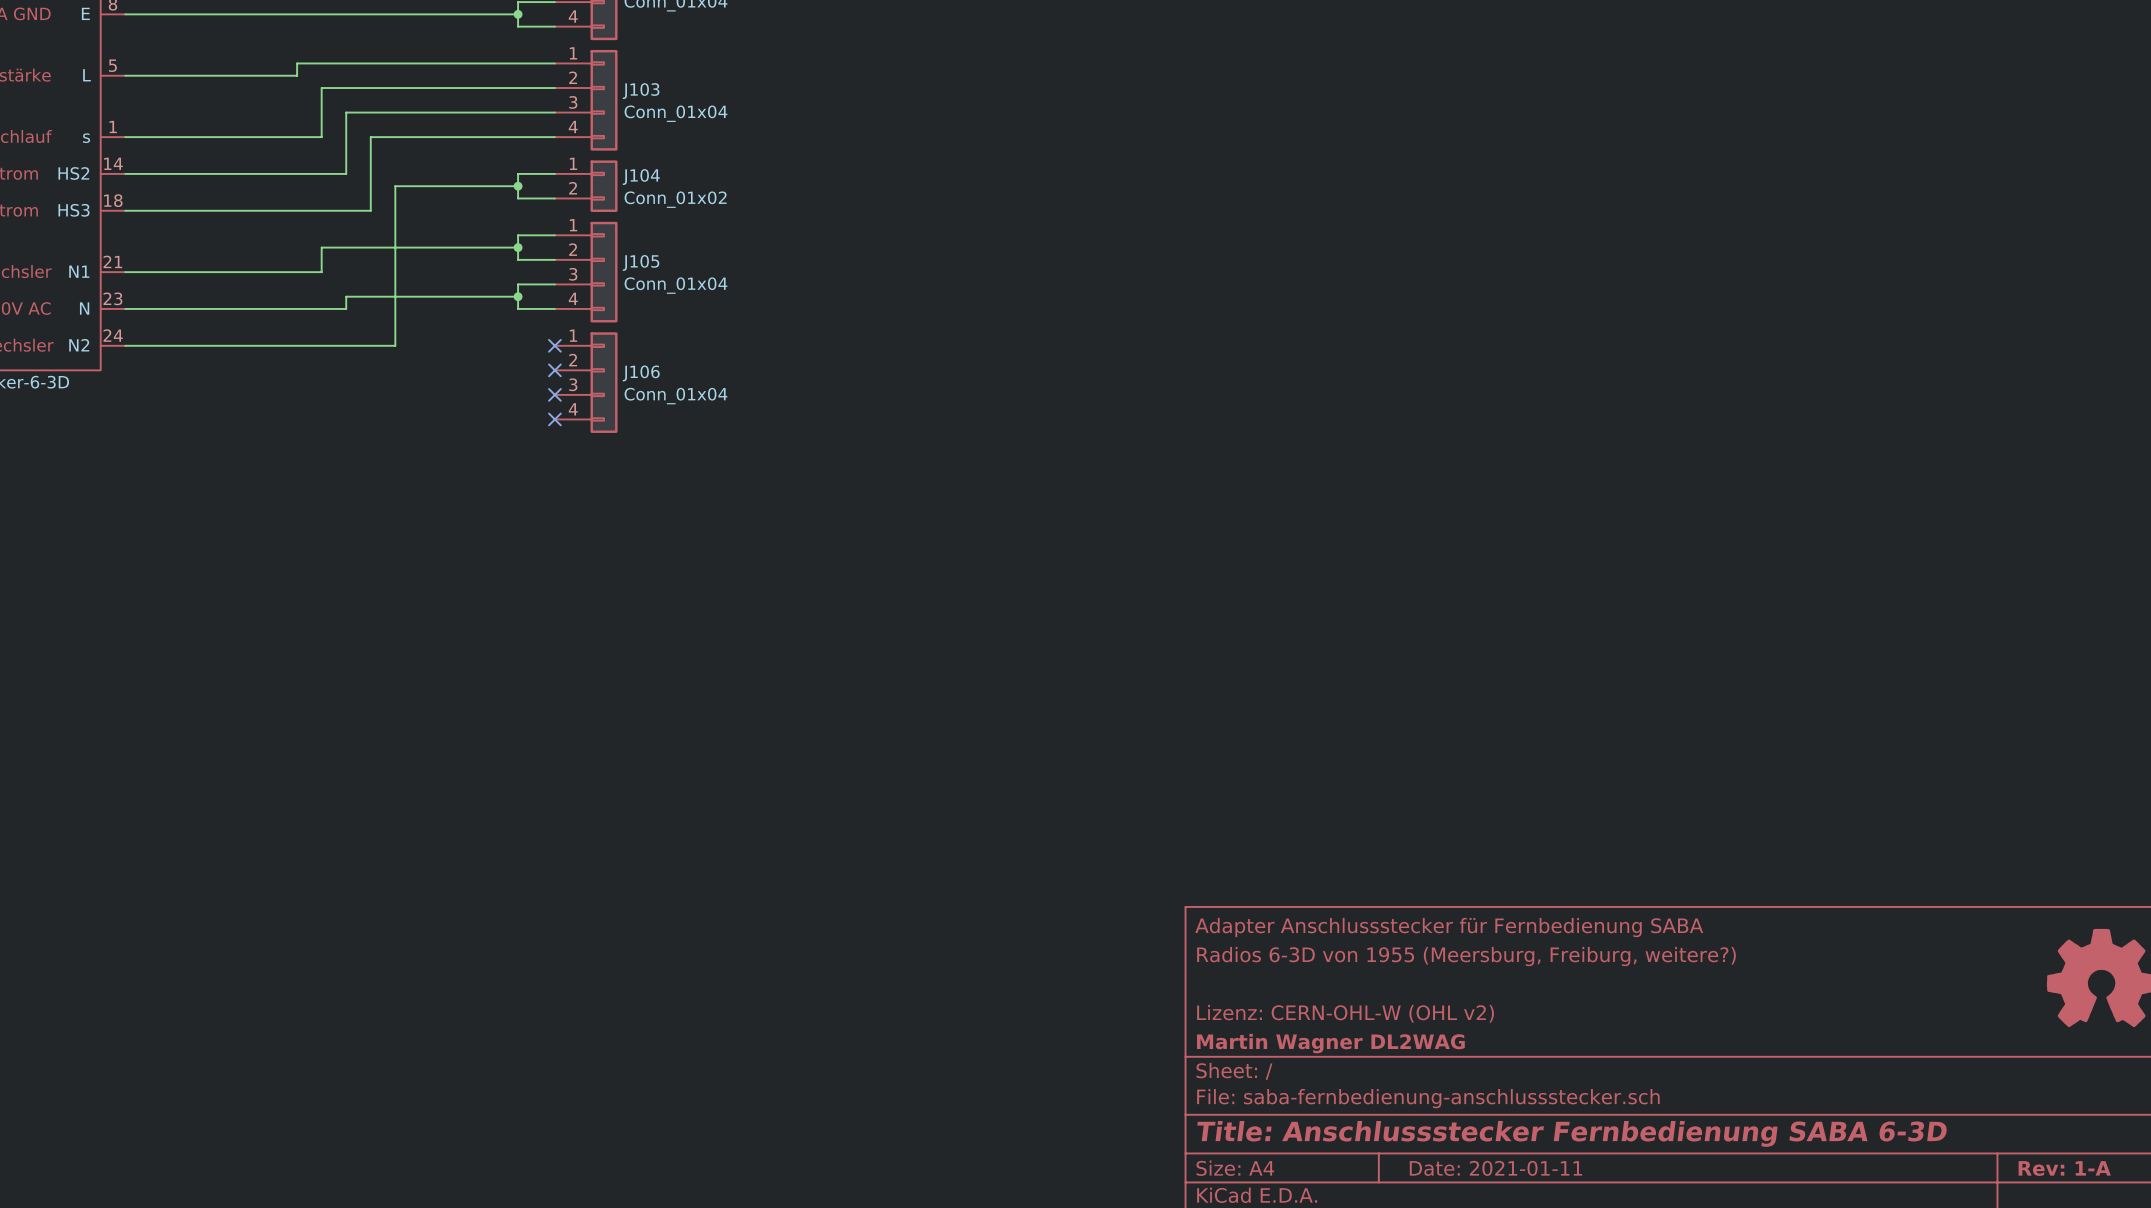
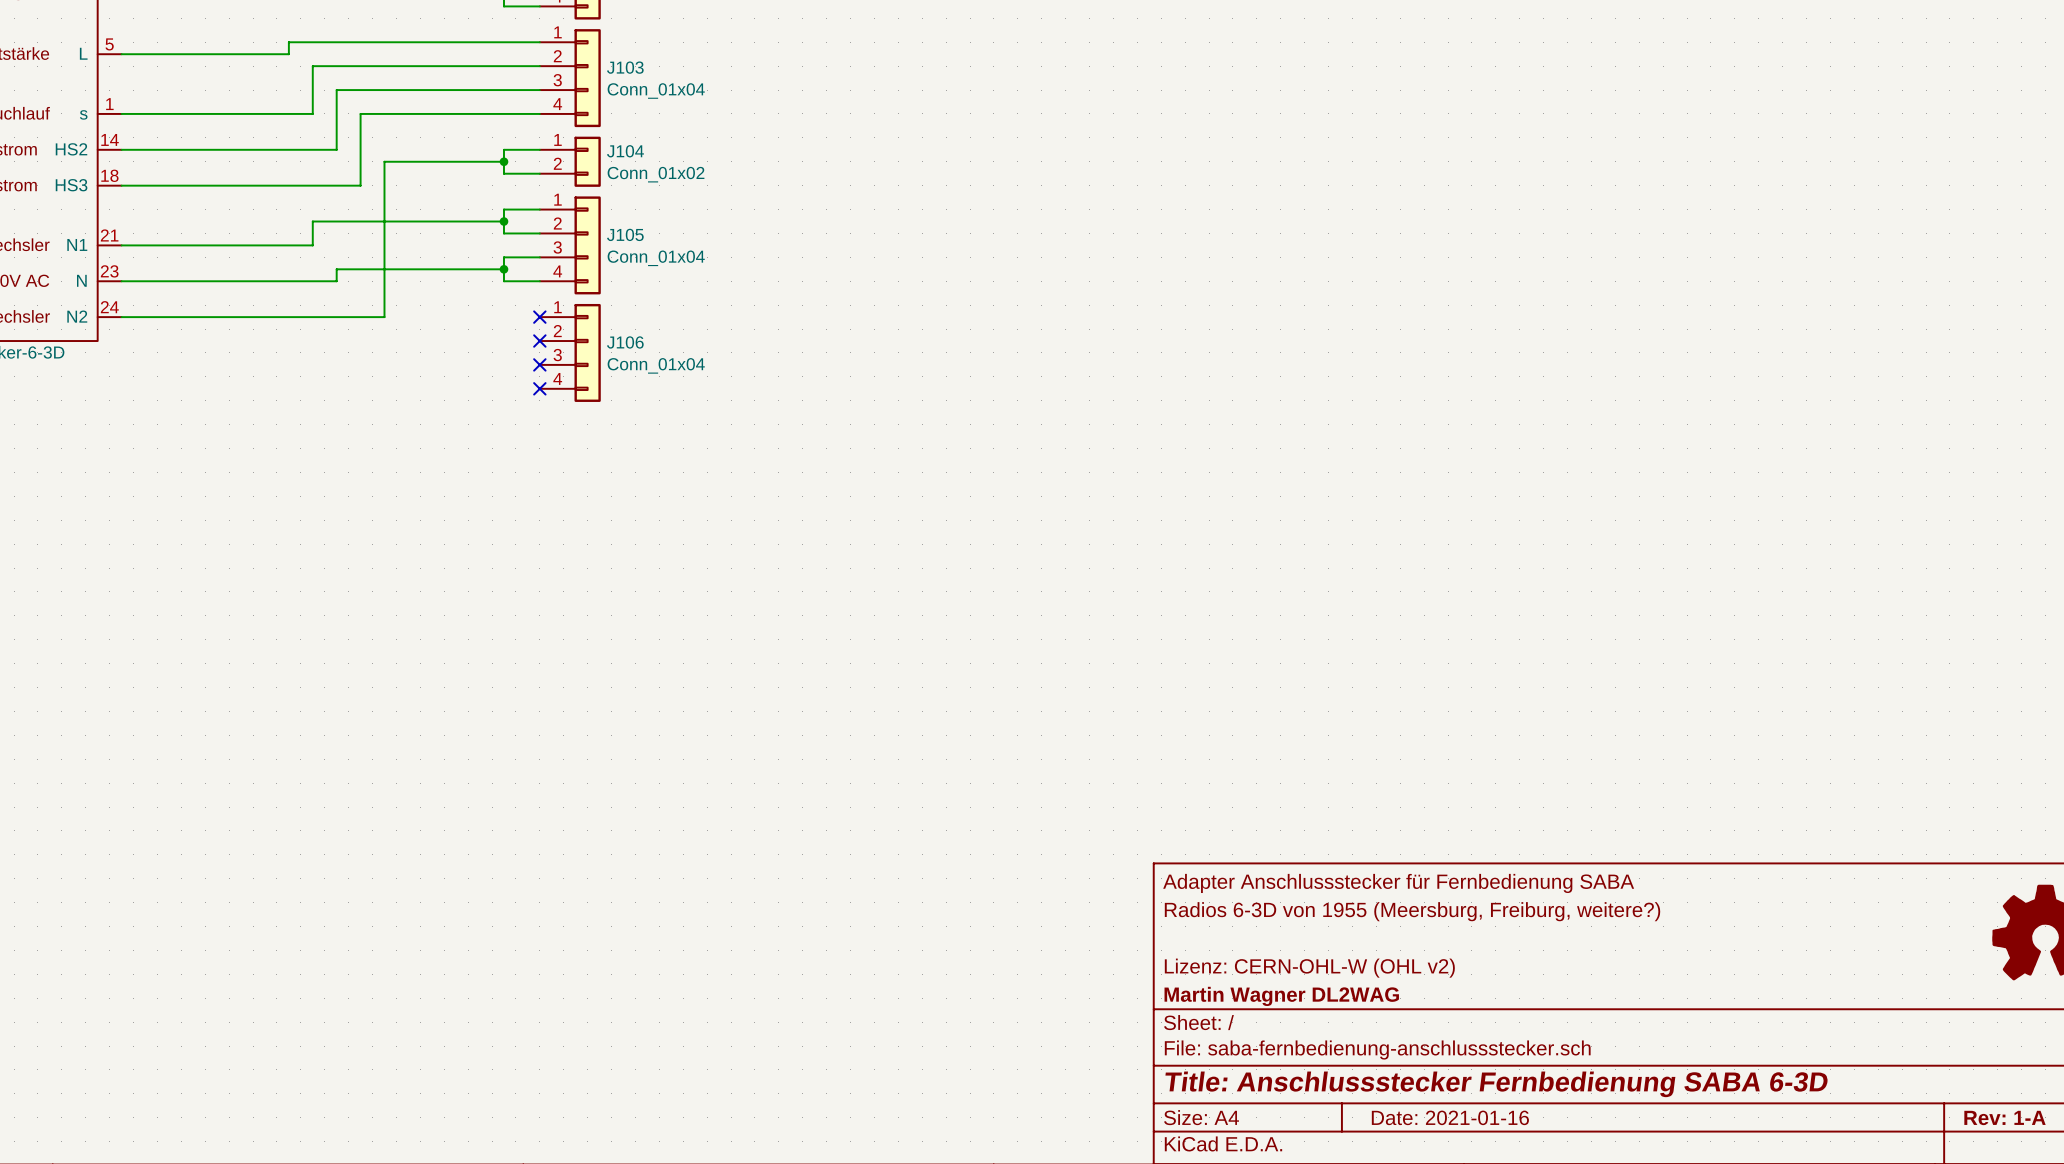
title block: Date: 2021-01-11 (1495, 1168) -> Date: 2021-01-16 (1450, 1117)

